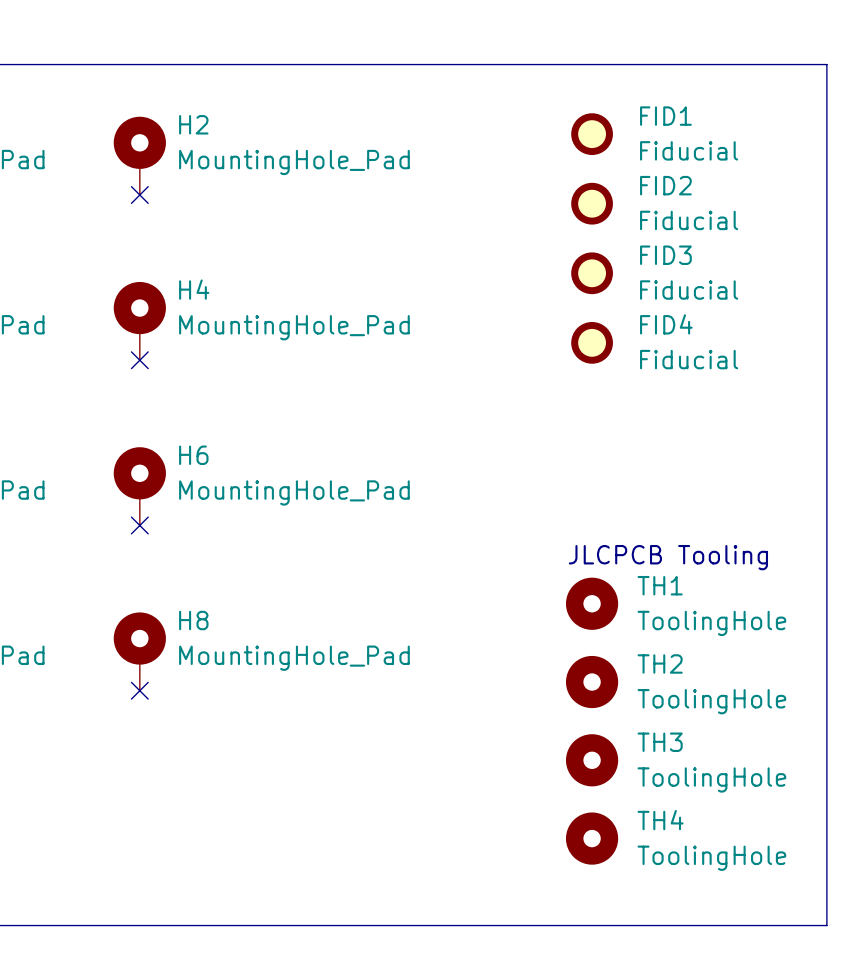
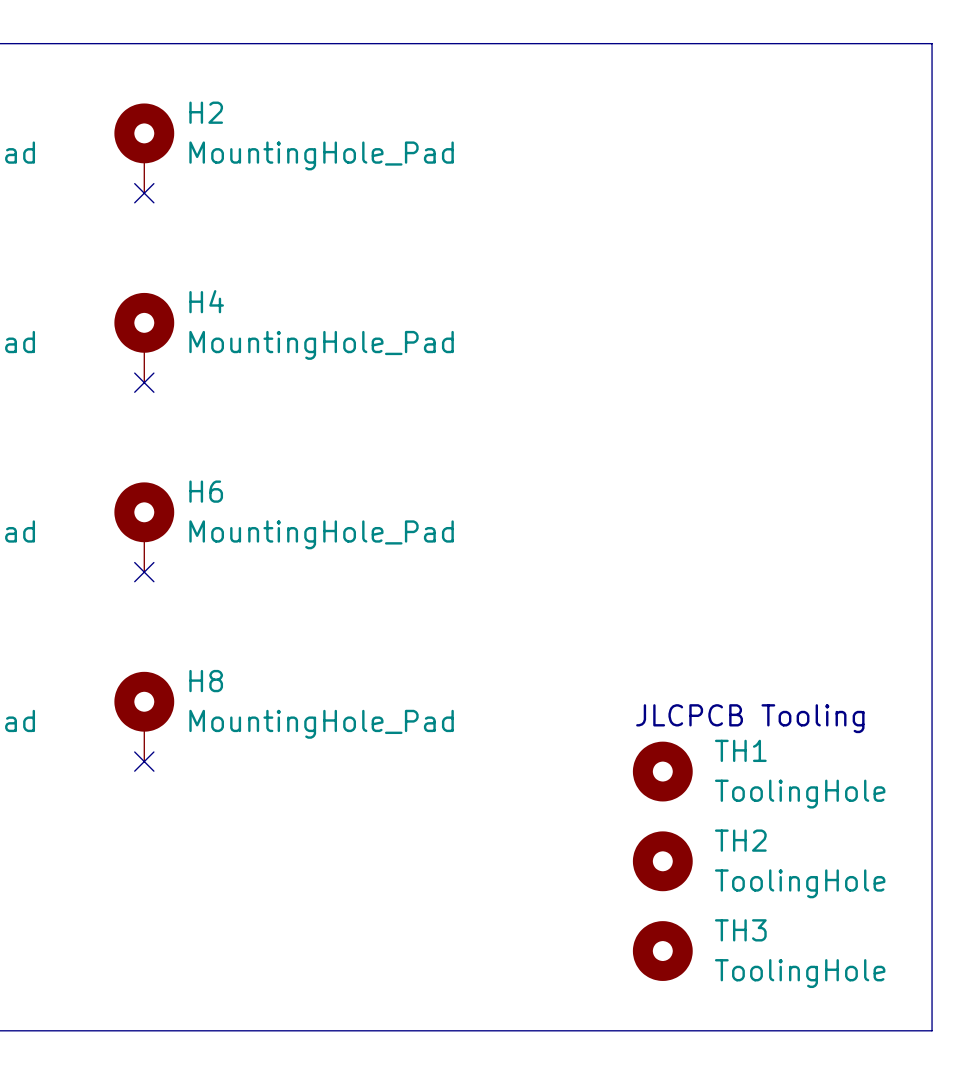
FID1: Fiducial (592, 134) -> none
FID2: Fiducial (592, 203) -> none
FID3: Fiducial (592, 273) -> none
FID4: Fiducial (592, 342) -> none
text position: JLCPCB Tooling (668, 557) -> JLCPCB Tooling (750, 718)
TH1 position: (592, 603) -> (662, 771)
TH2 position: (592, 682) -> (662, 861)
TH3 position: (592, 760) -> (662, 951)
TH4: ToolingHole (592, 838) -> none

